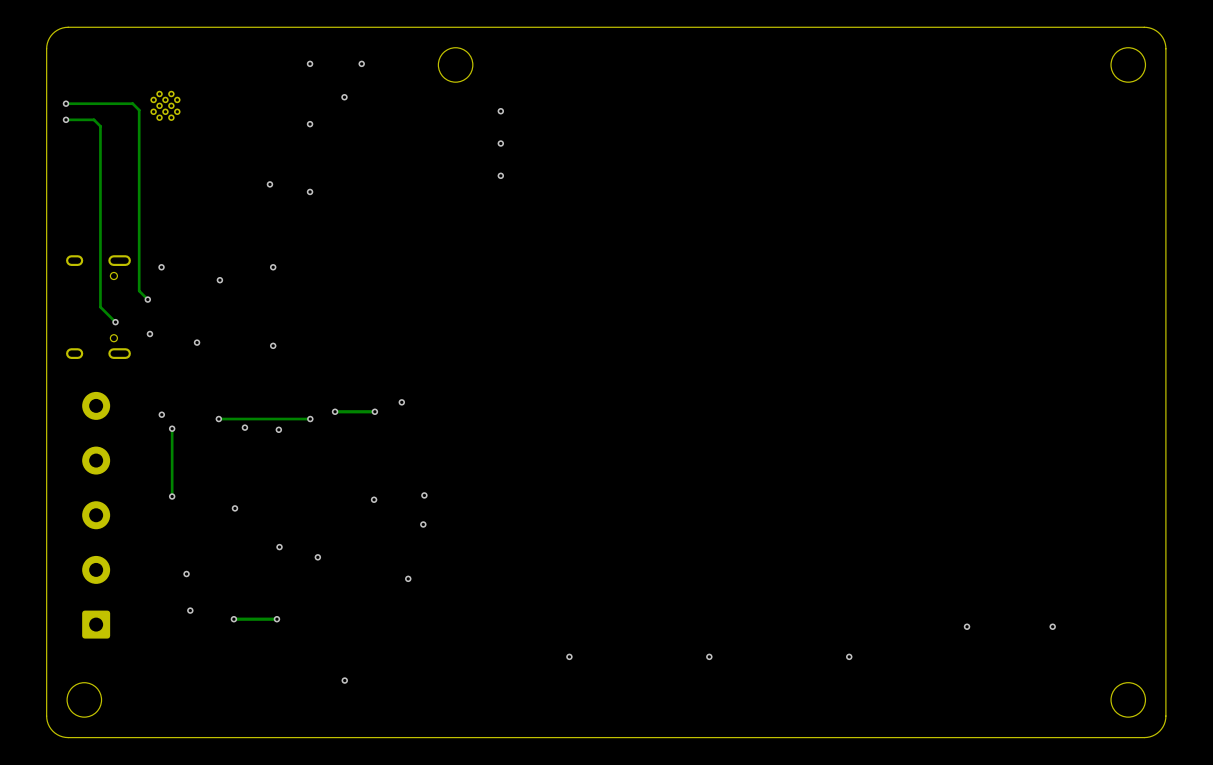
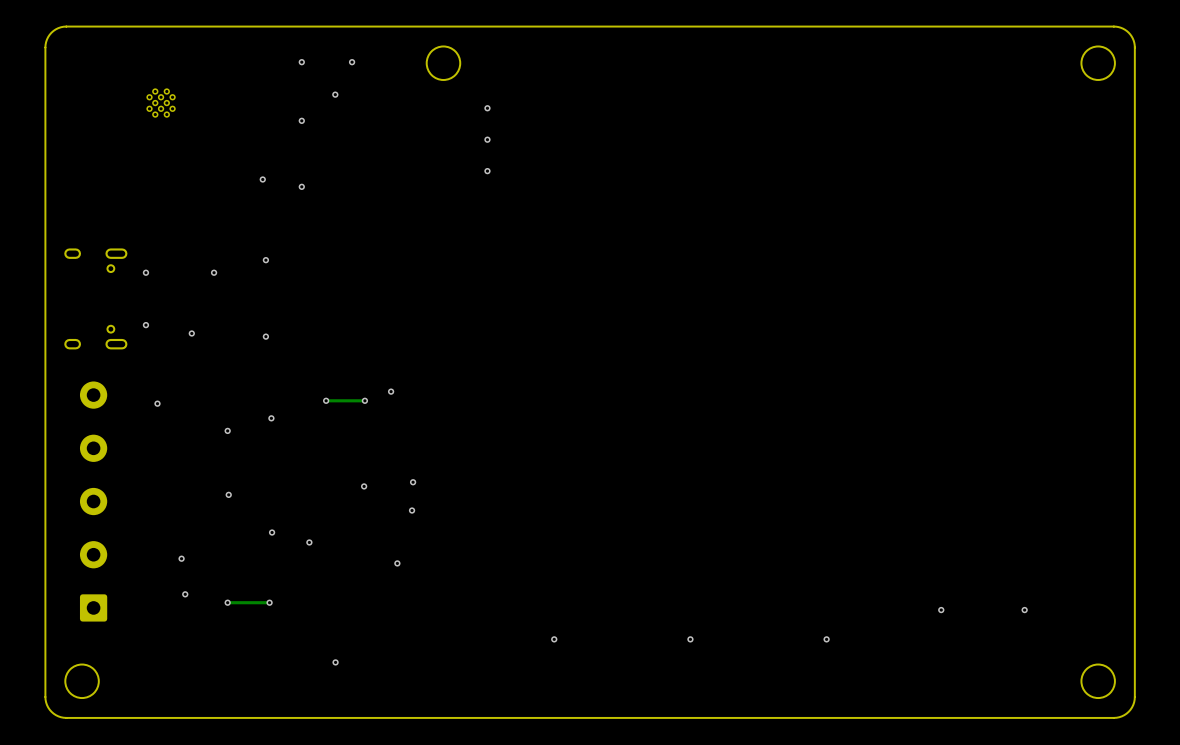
track: (66, 103) (132, 103) (139, 110) (139, 290) (147, 299) -> none
via: (66, 103) -> none
track: (66, 119) (94, 119) (100, 126) (100, 307) (115, 322) -> none
via: (66, 119) -> none
via: (161, 267) -> none
via: none -> (145, 272)
via: (147, 299) -> none
via: (115, 322) -> none
via: (218, 419) -> none
track: (310, 419) (218, 419) -> none
via: (310, 419) -> none
via: (244, 427) -> none
track: (172, 428) (172, 496) -> none
via: (172, 428) -> none
via: none -> (227, 430)
via: (172, 496) -> none

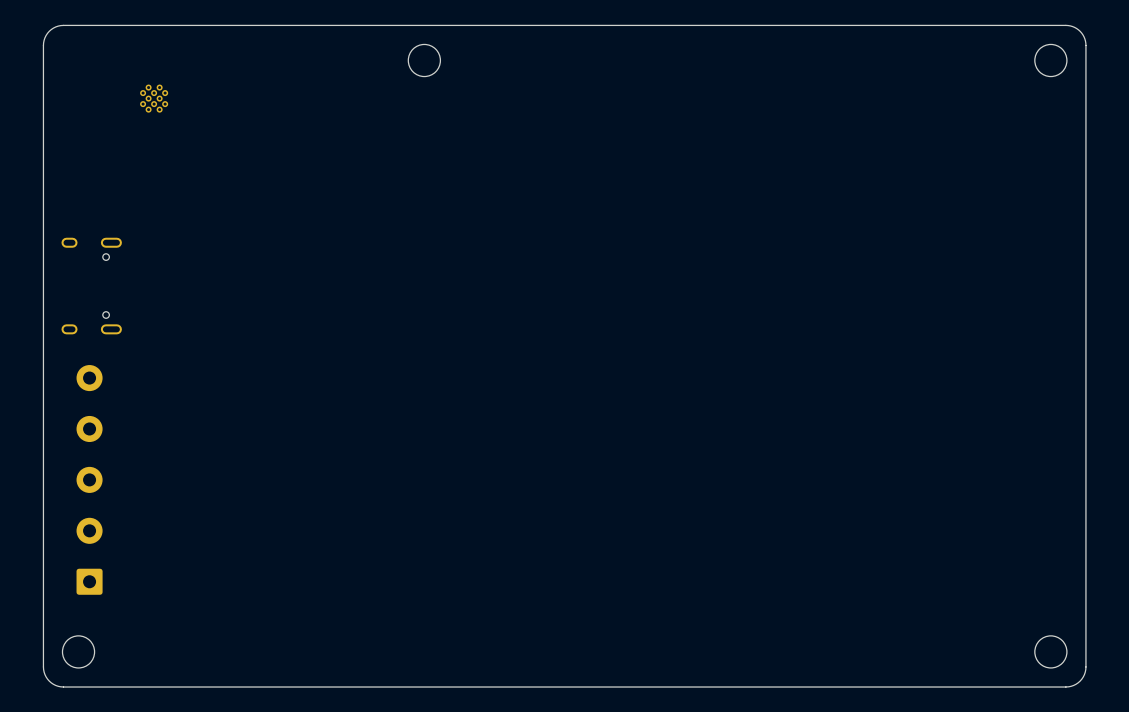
via: (301, 62) -> none
via: (352, 62) -> none
via: (335, 94) -> none
via: (487, 108) -> none
via: (301, 120) -> none
via: (487, 139) -> none
via: (487, 171) -> none
via: (262, 179) -> none
via: (301, 186) -> none
via: (265, 260) -> none
via: (145, 272) -> none
via: (214, 272) -> none
via: (145, 325) -> none
via: (191, 333) -> none
via: (265, 336) -> none
via: (391, 391) -> none
via: (326, 400) -> none
track: (364, 400) (326, 400) -> none
via: (364, 400) -> none
via: (157, 403) -> none
via: (271, 418) -> none
via: (227, 430) -> none
via: (413, 482) -> none
via: (364, 486) -> none
via: (228, 494) -> none
via: (412, 510) -> none
via: (272, 532) -> none
via: (309, 542) -> none
via: (181, 558) -> none
via: (397, 563) -> none
via: (185, 594) -> none
via: (227, 602) -> none
track: (269, 602) (227, 602) -> none
via: (269, 602) -> none
via: (941, 610) -> none
via: (1024, 610) -> none
via: (554, 639) -> none
via: (690, 639) -> none
via: (826, 639) -> none
via: (335, 662) -> none

